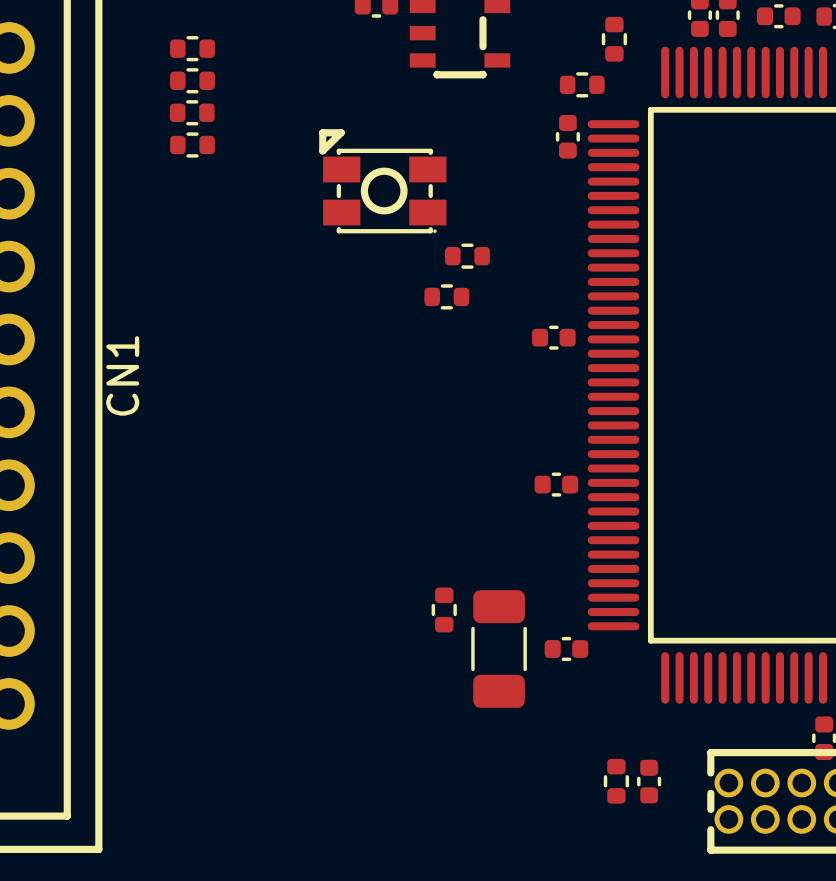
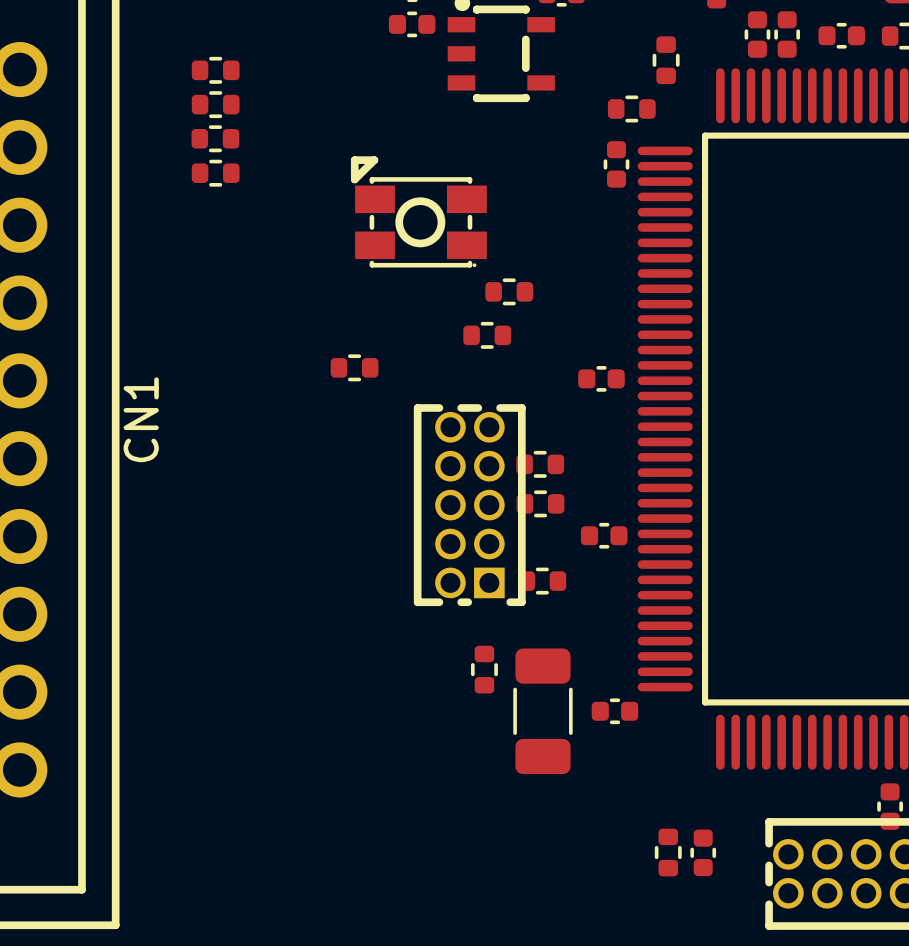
part: none -> (354, 367)
part: none -> (540, 464)
part: none -> (540, 503)
part: none -> (469, 505)
part: none -> (542, 581)

